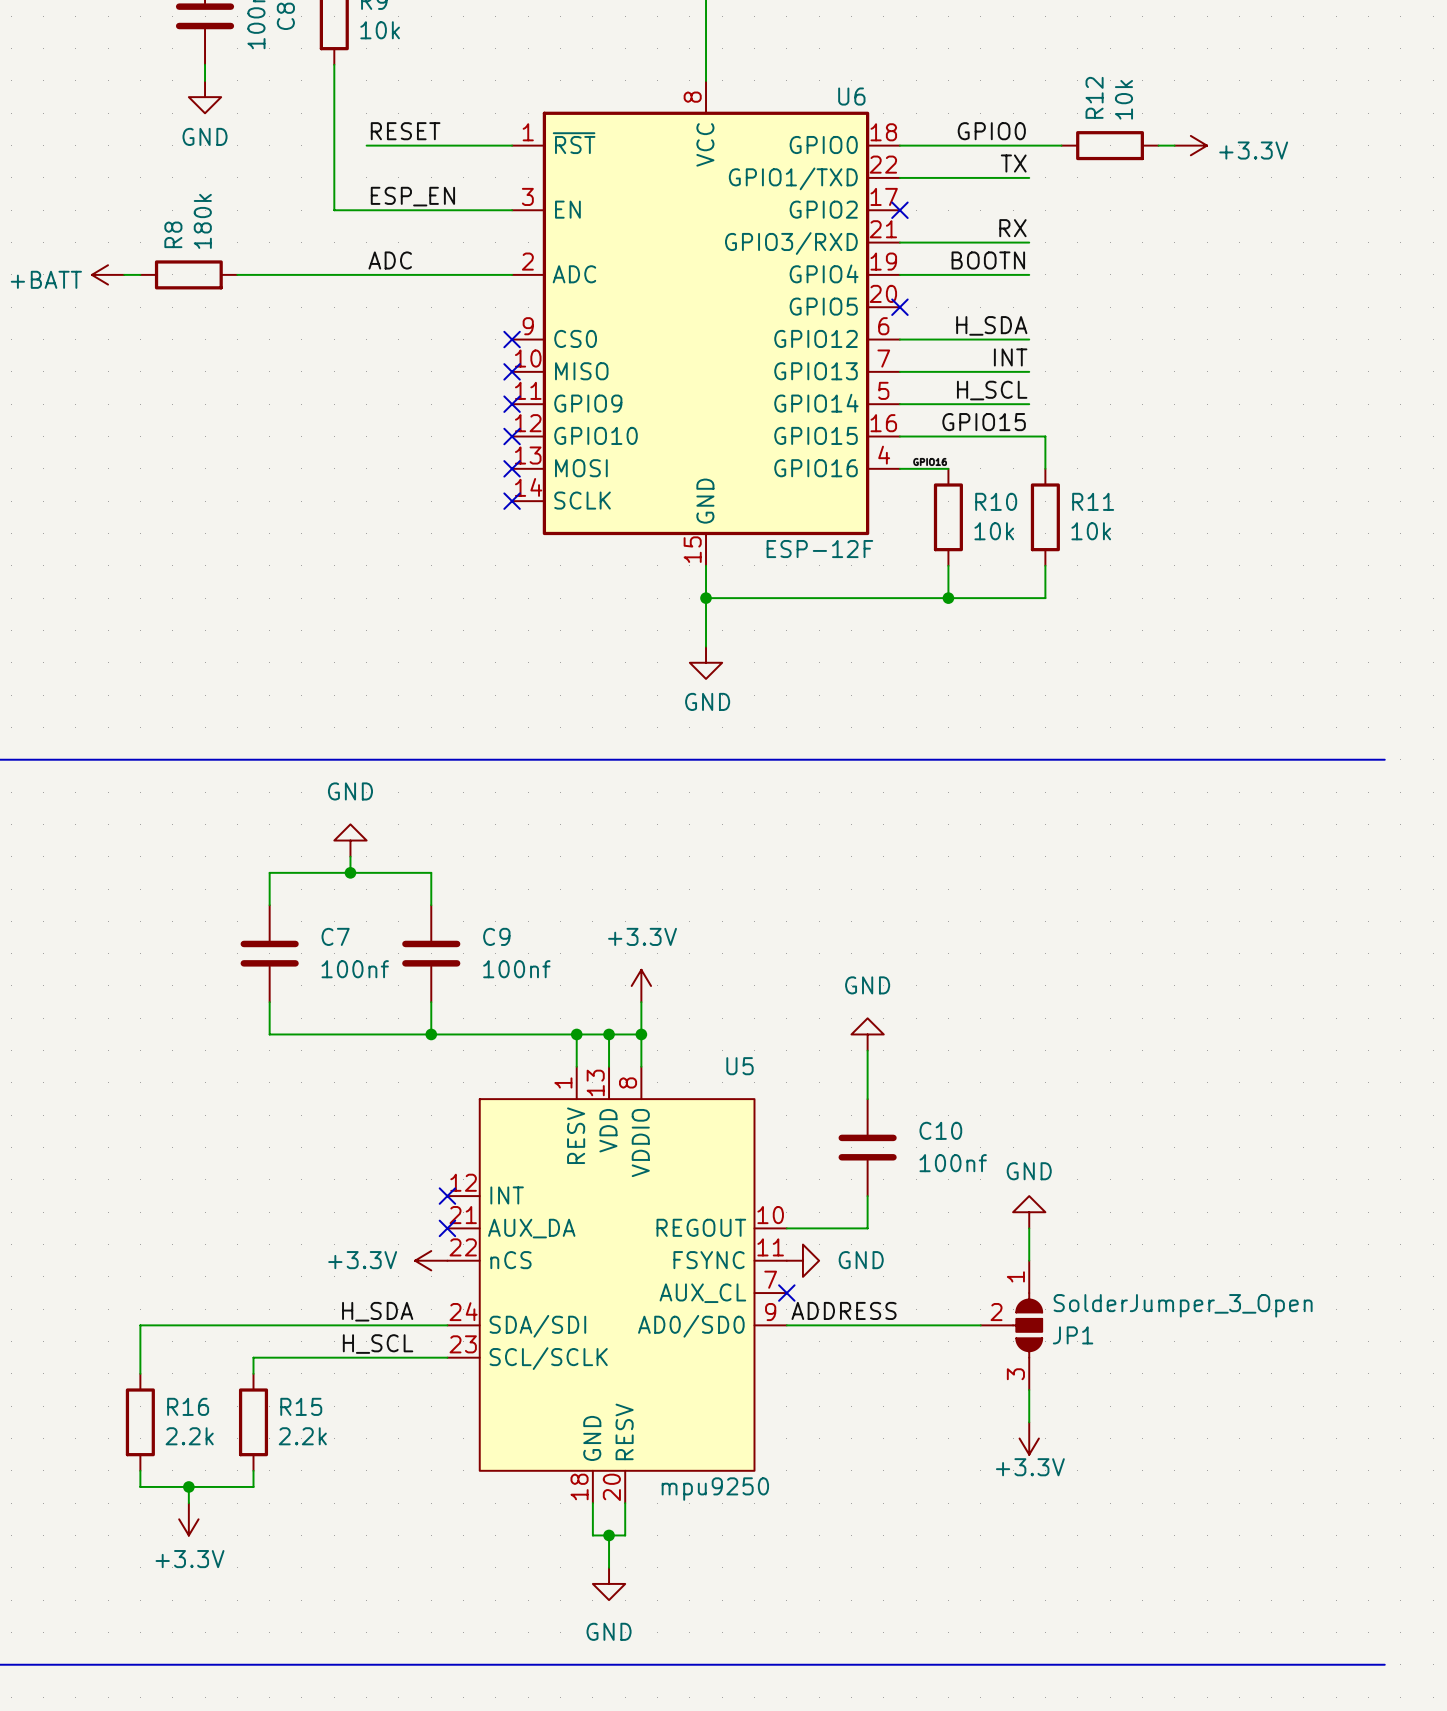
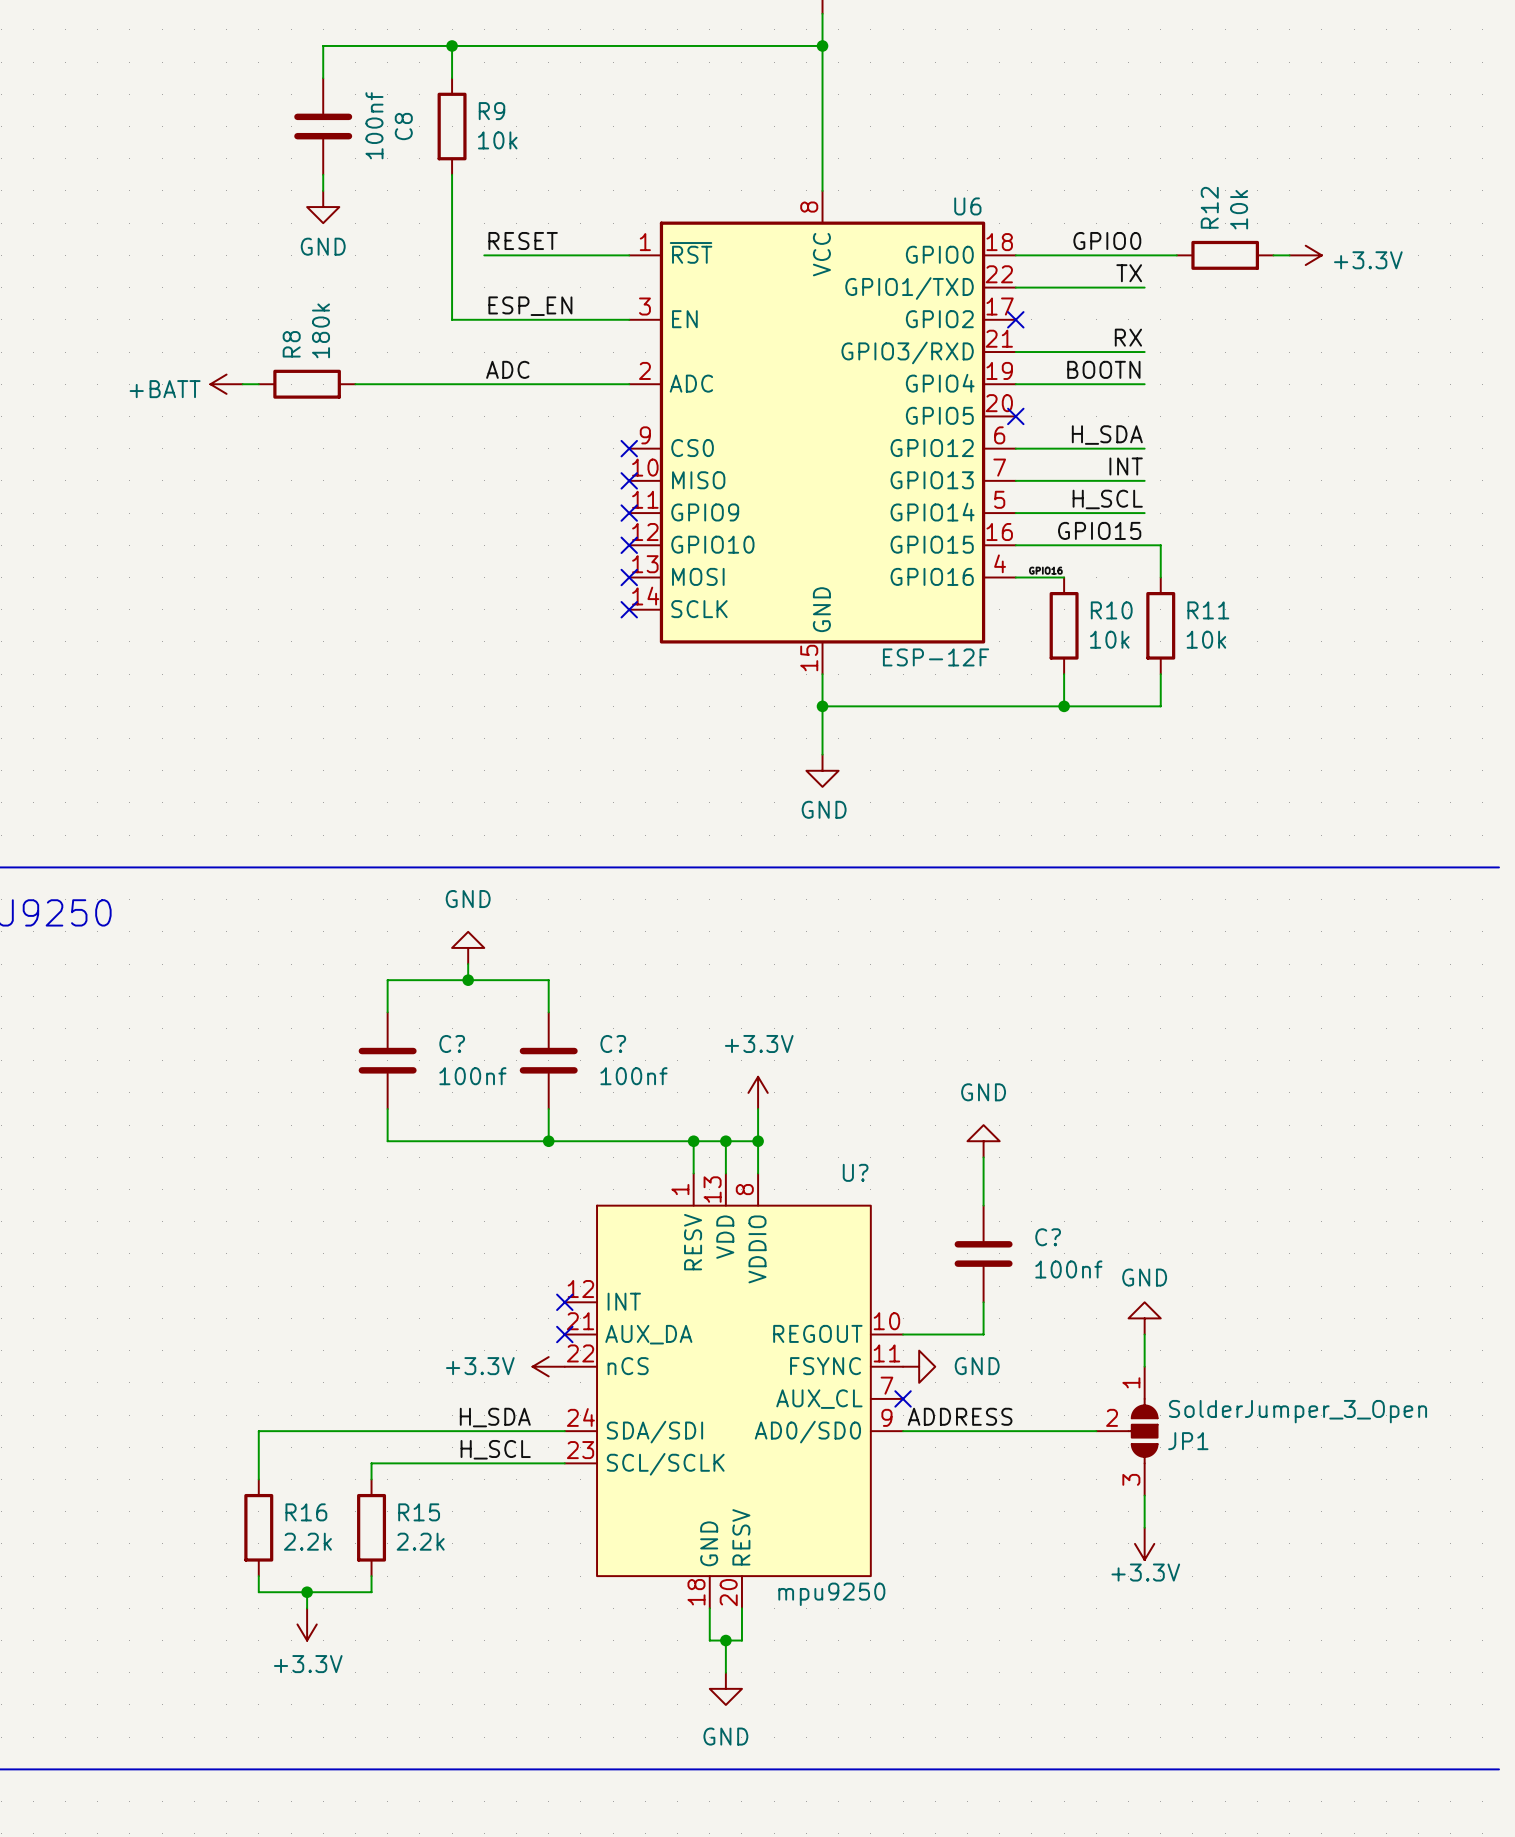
C7 name: C7 (335, 936) -> C? (452, 1043)
C9 name: C9 (496, 936) -> C? (613, 1043)
U5 name: U5 (739, 1066) -> U? (855, 1172)
C10 name: C10 (940, 1130) -> C? (1048, 1237)

